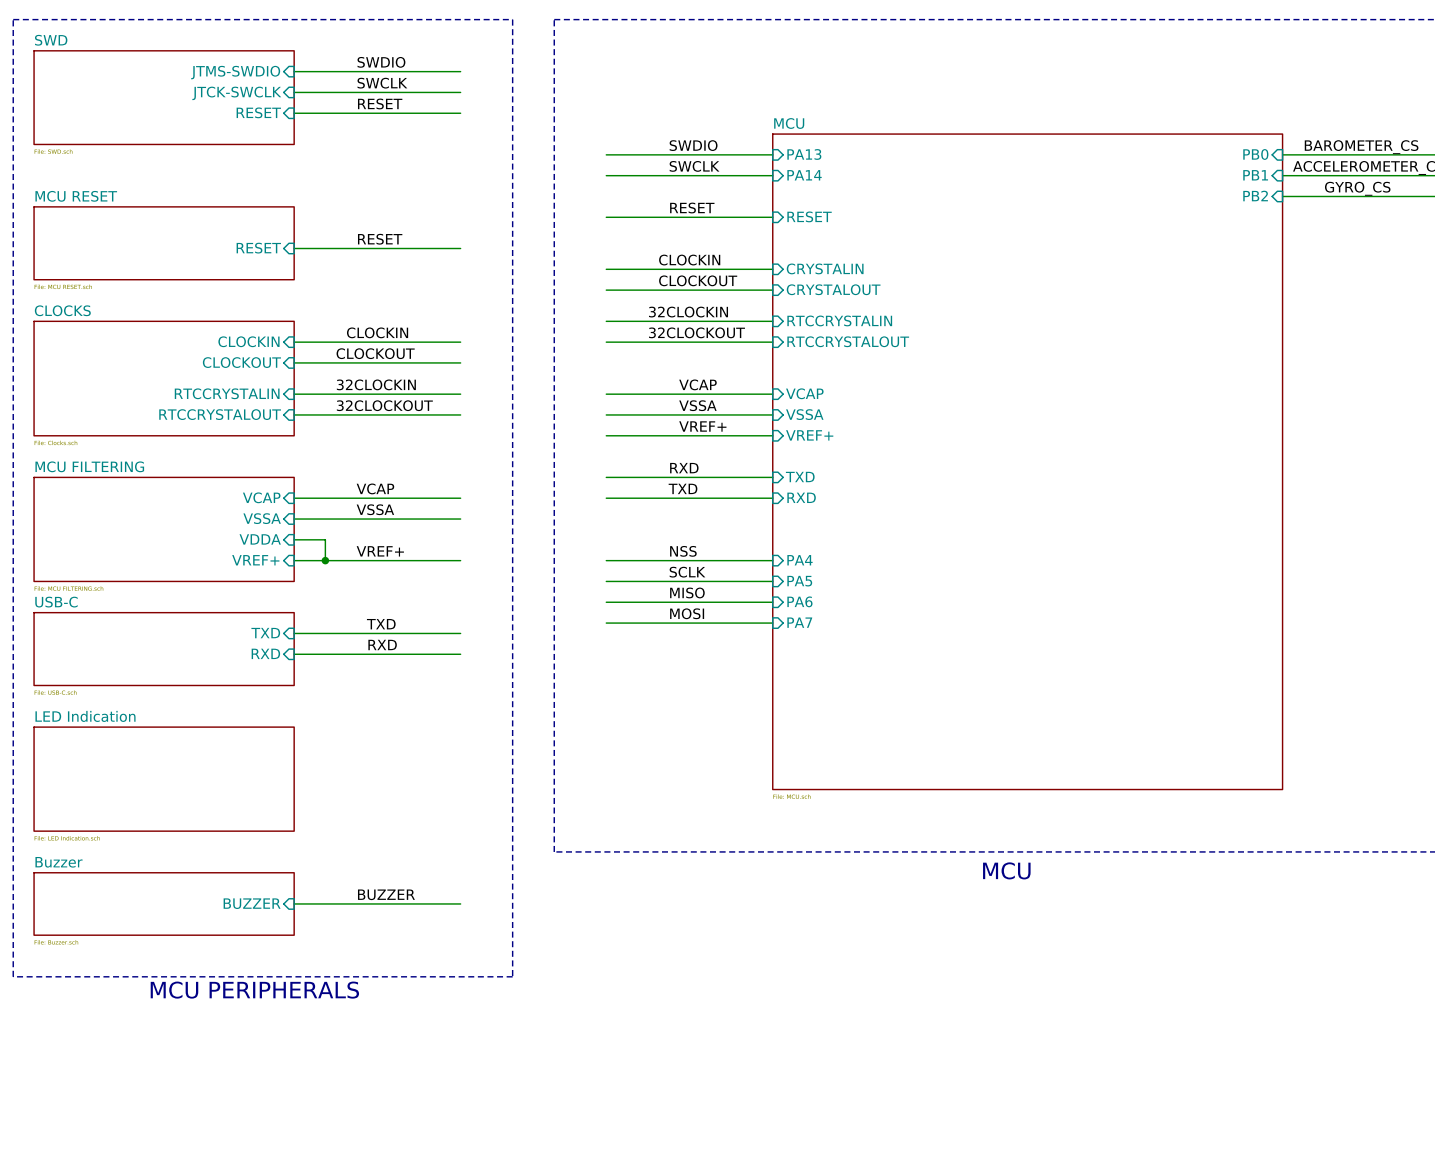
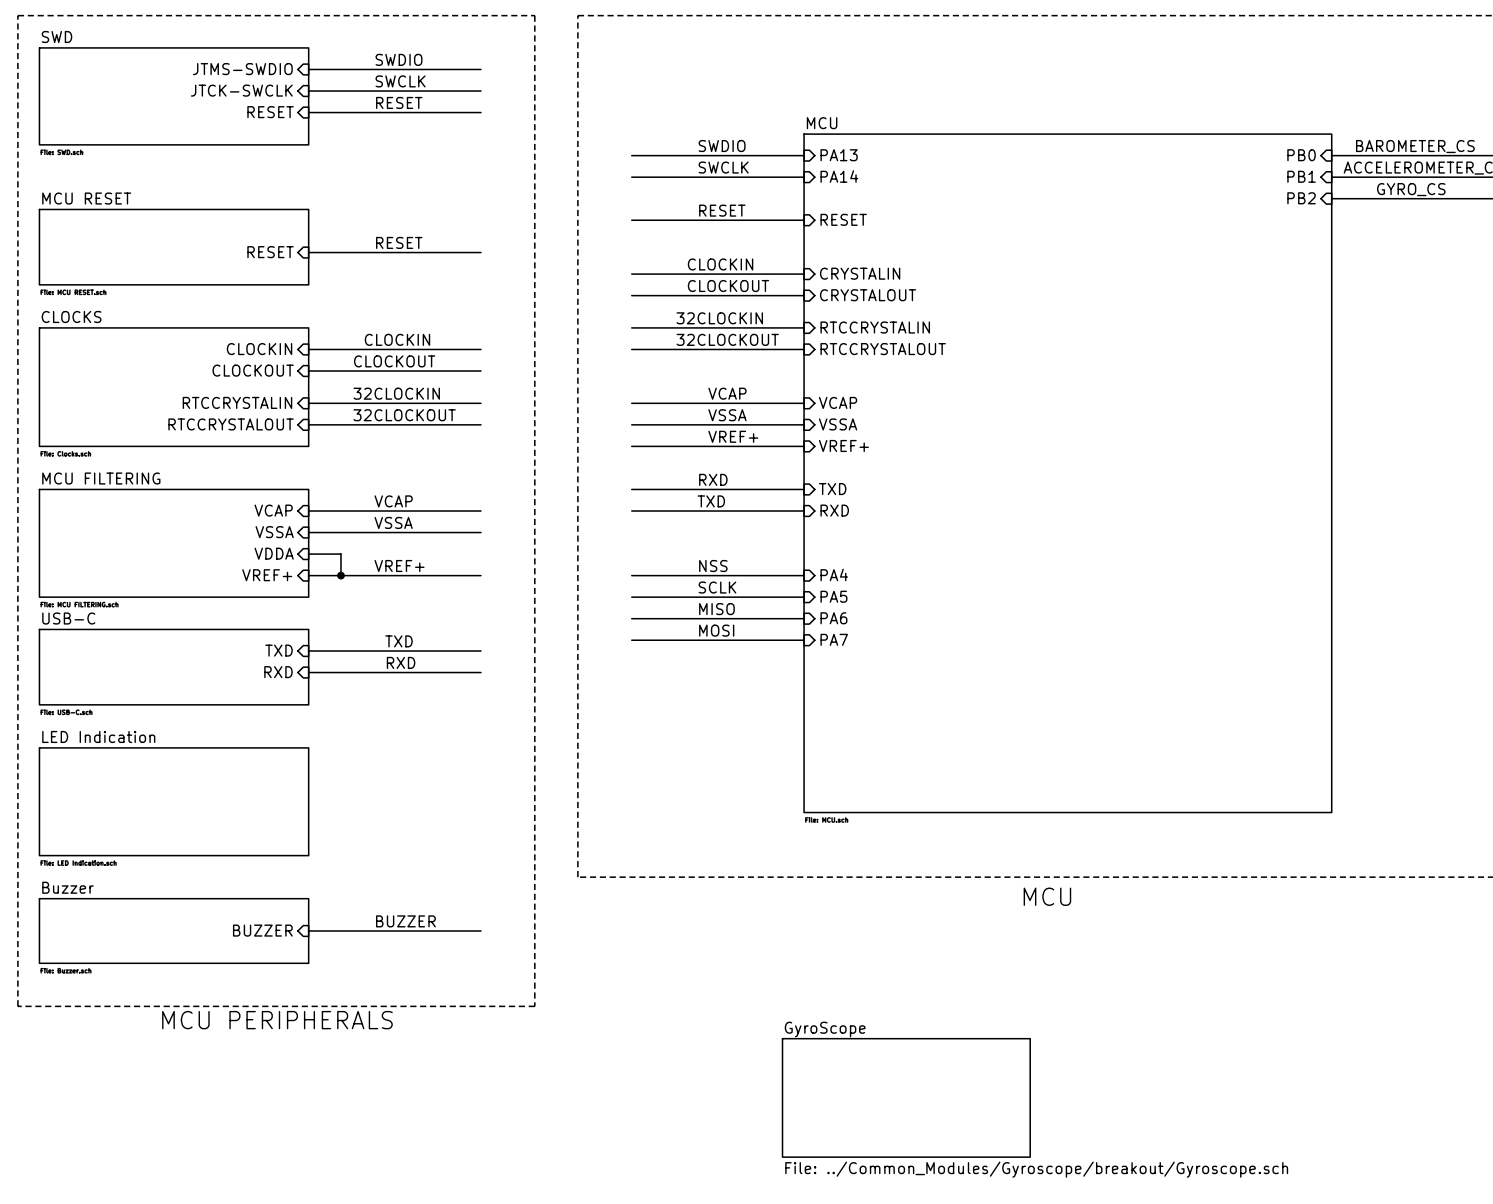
sheet GyroScope: none -> File: ../Common_Modules/Gyroscope/breakout/Gyroscope.sch (906, 1097)

